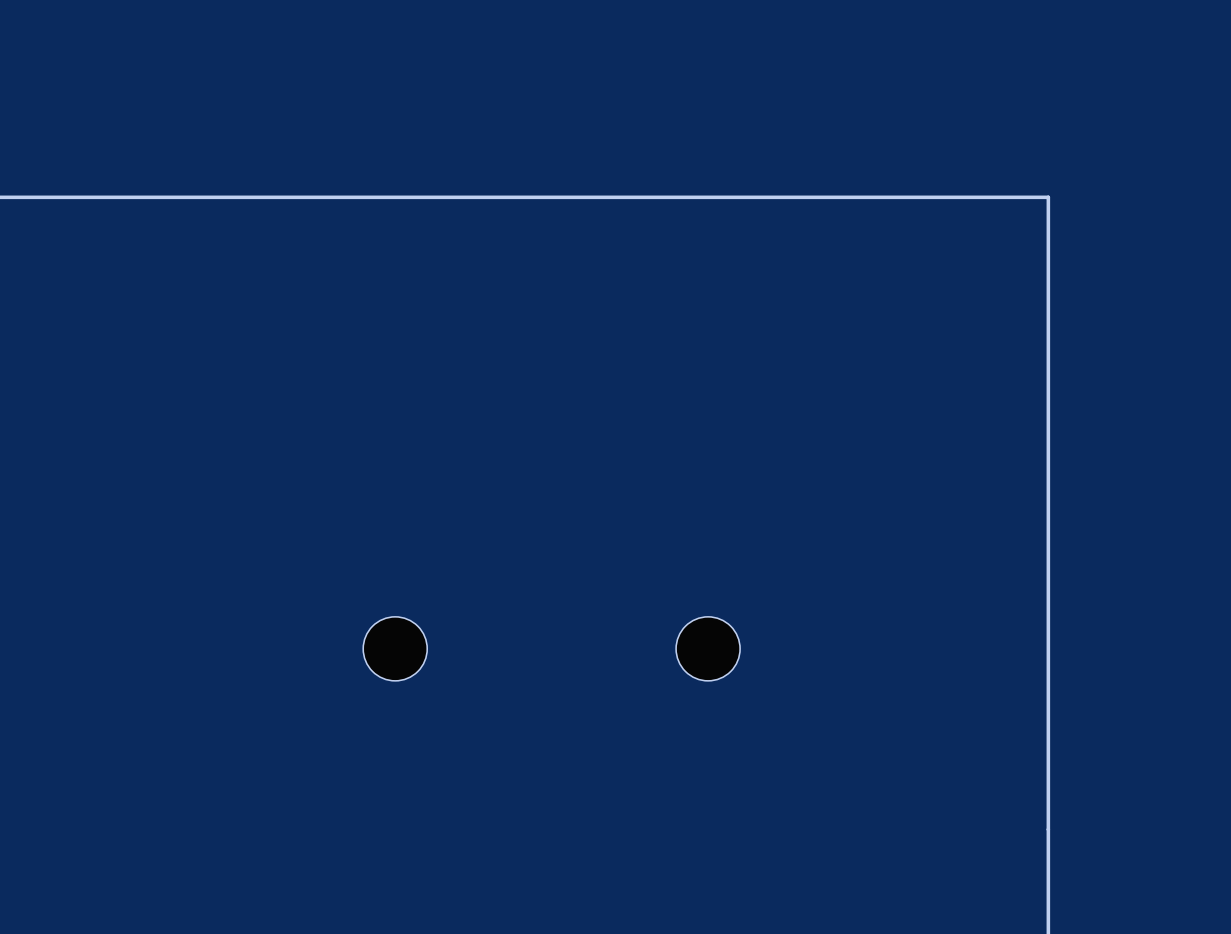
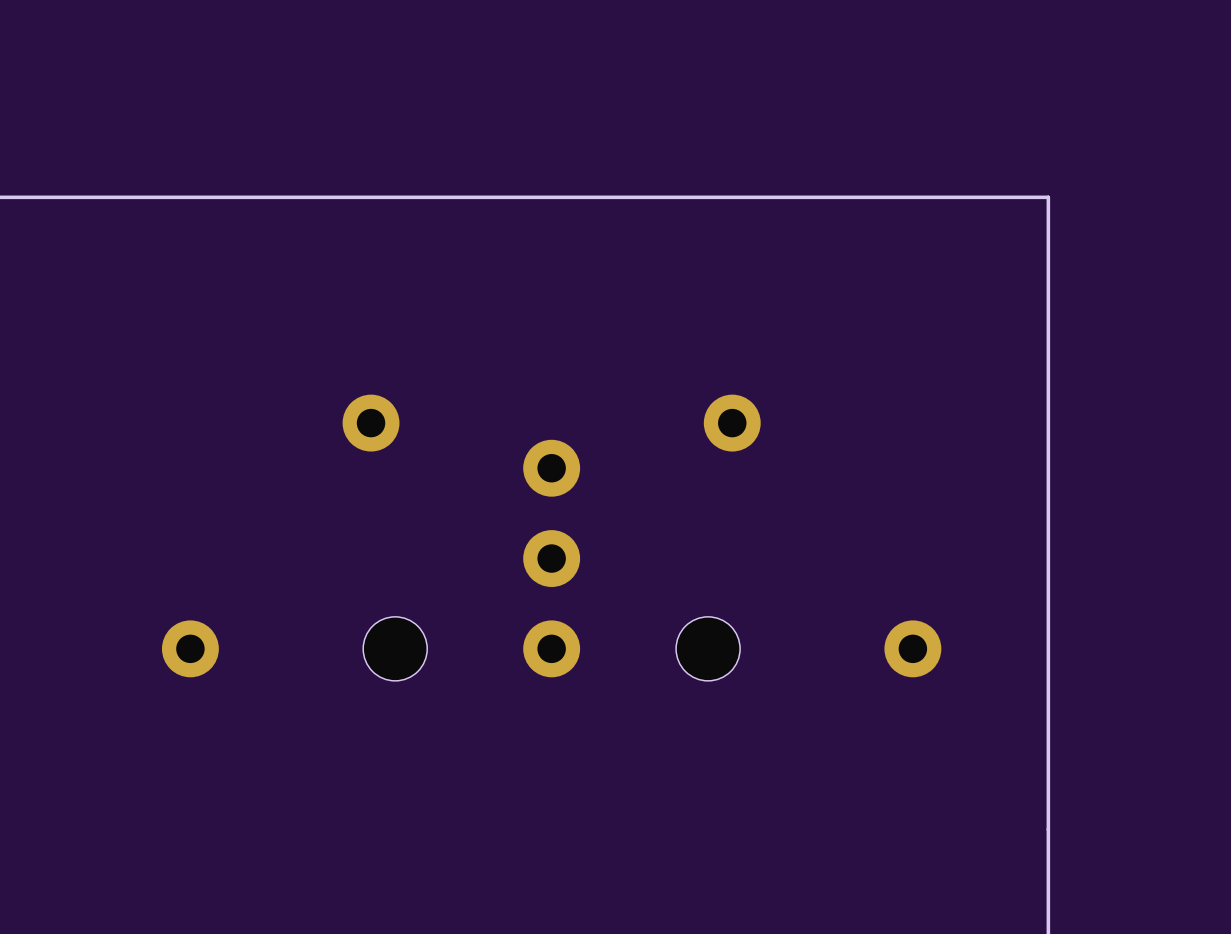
via: none -> (371, 423)
via: none -> (732, 423)
via: none -> (551, 468)
via: none -> (551, 558)
via: none -> (190, 648)
via: none -> (551, 648)
via: none -> (912, 648)

